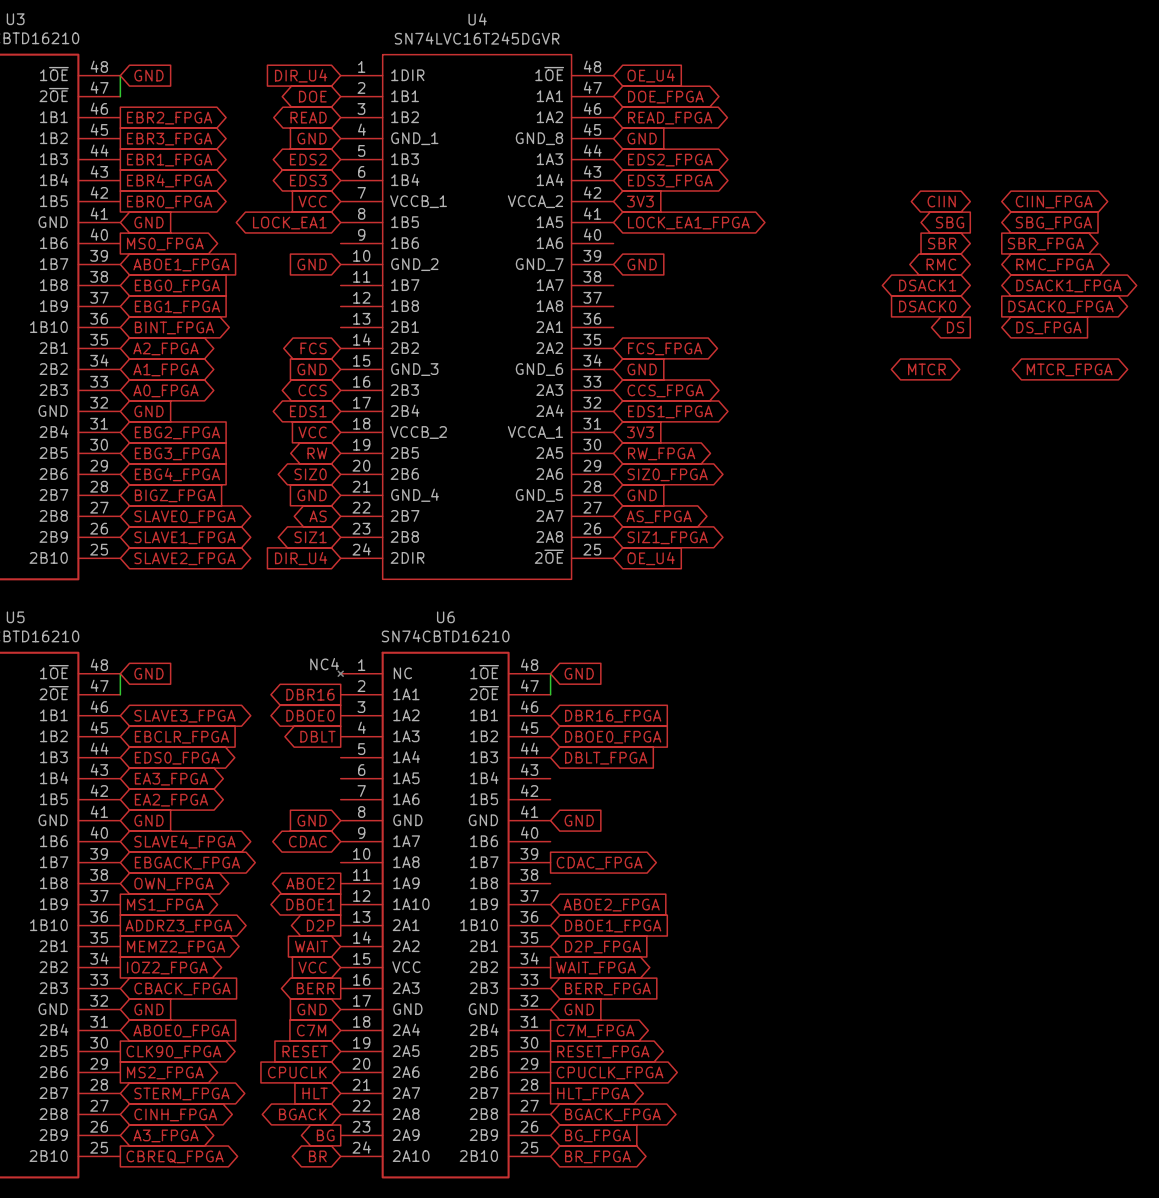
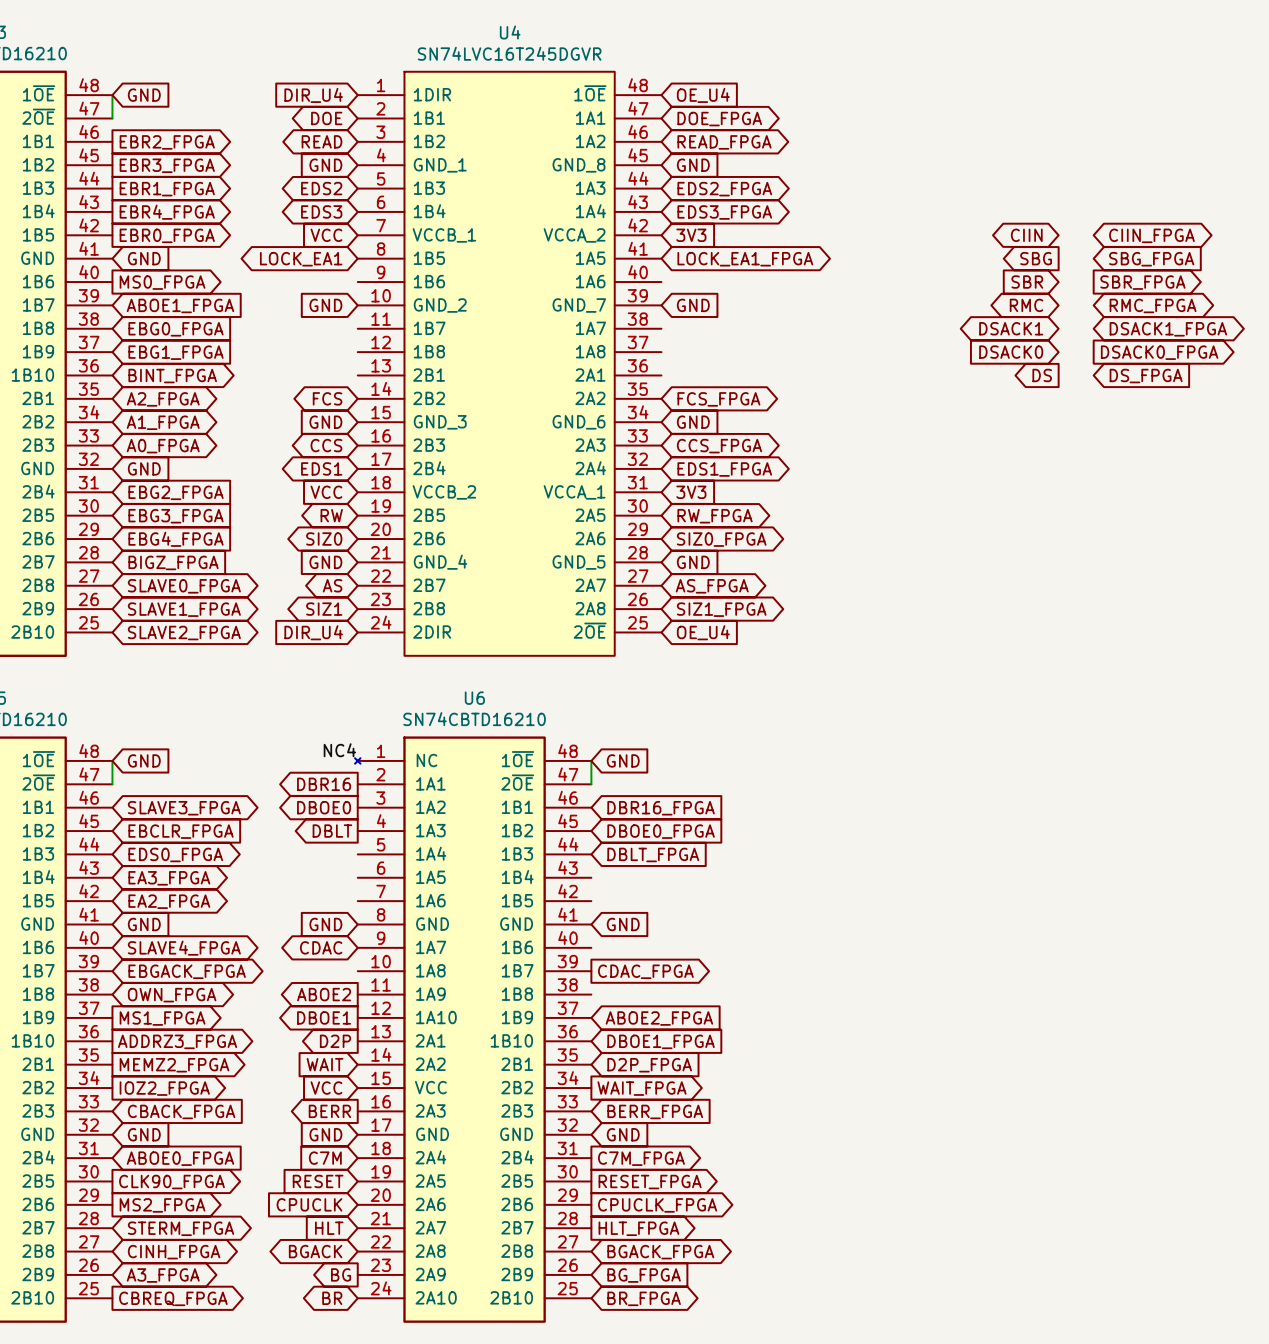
global label: MTCR (926, 369) -> none
global label: MTCR_FPGA (1069, 369) -> none

